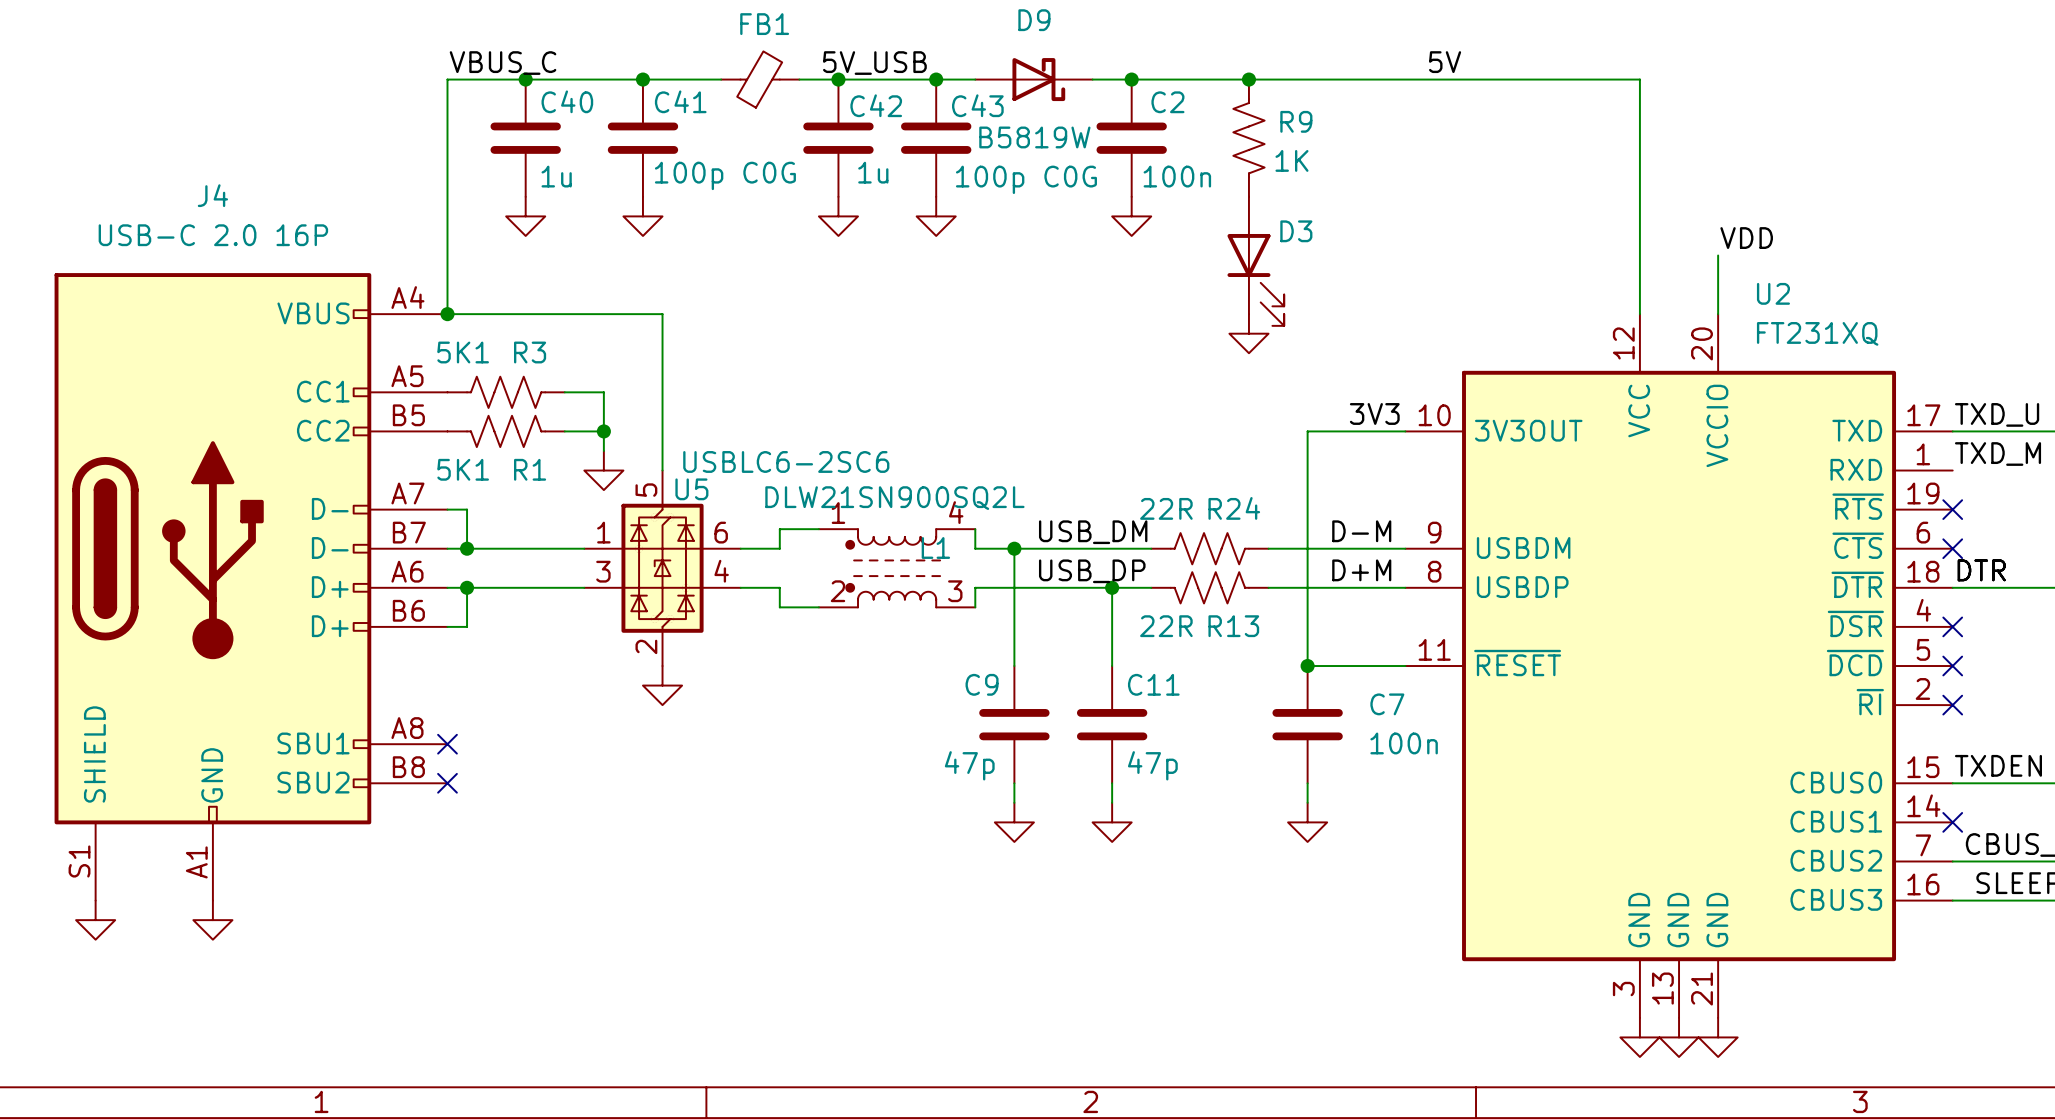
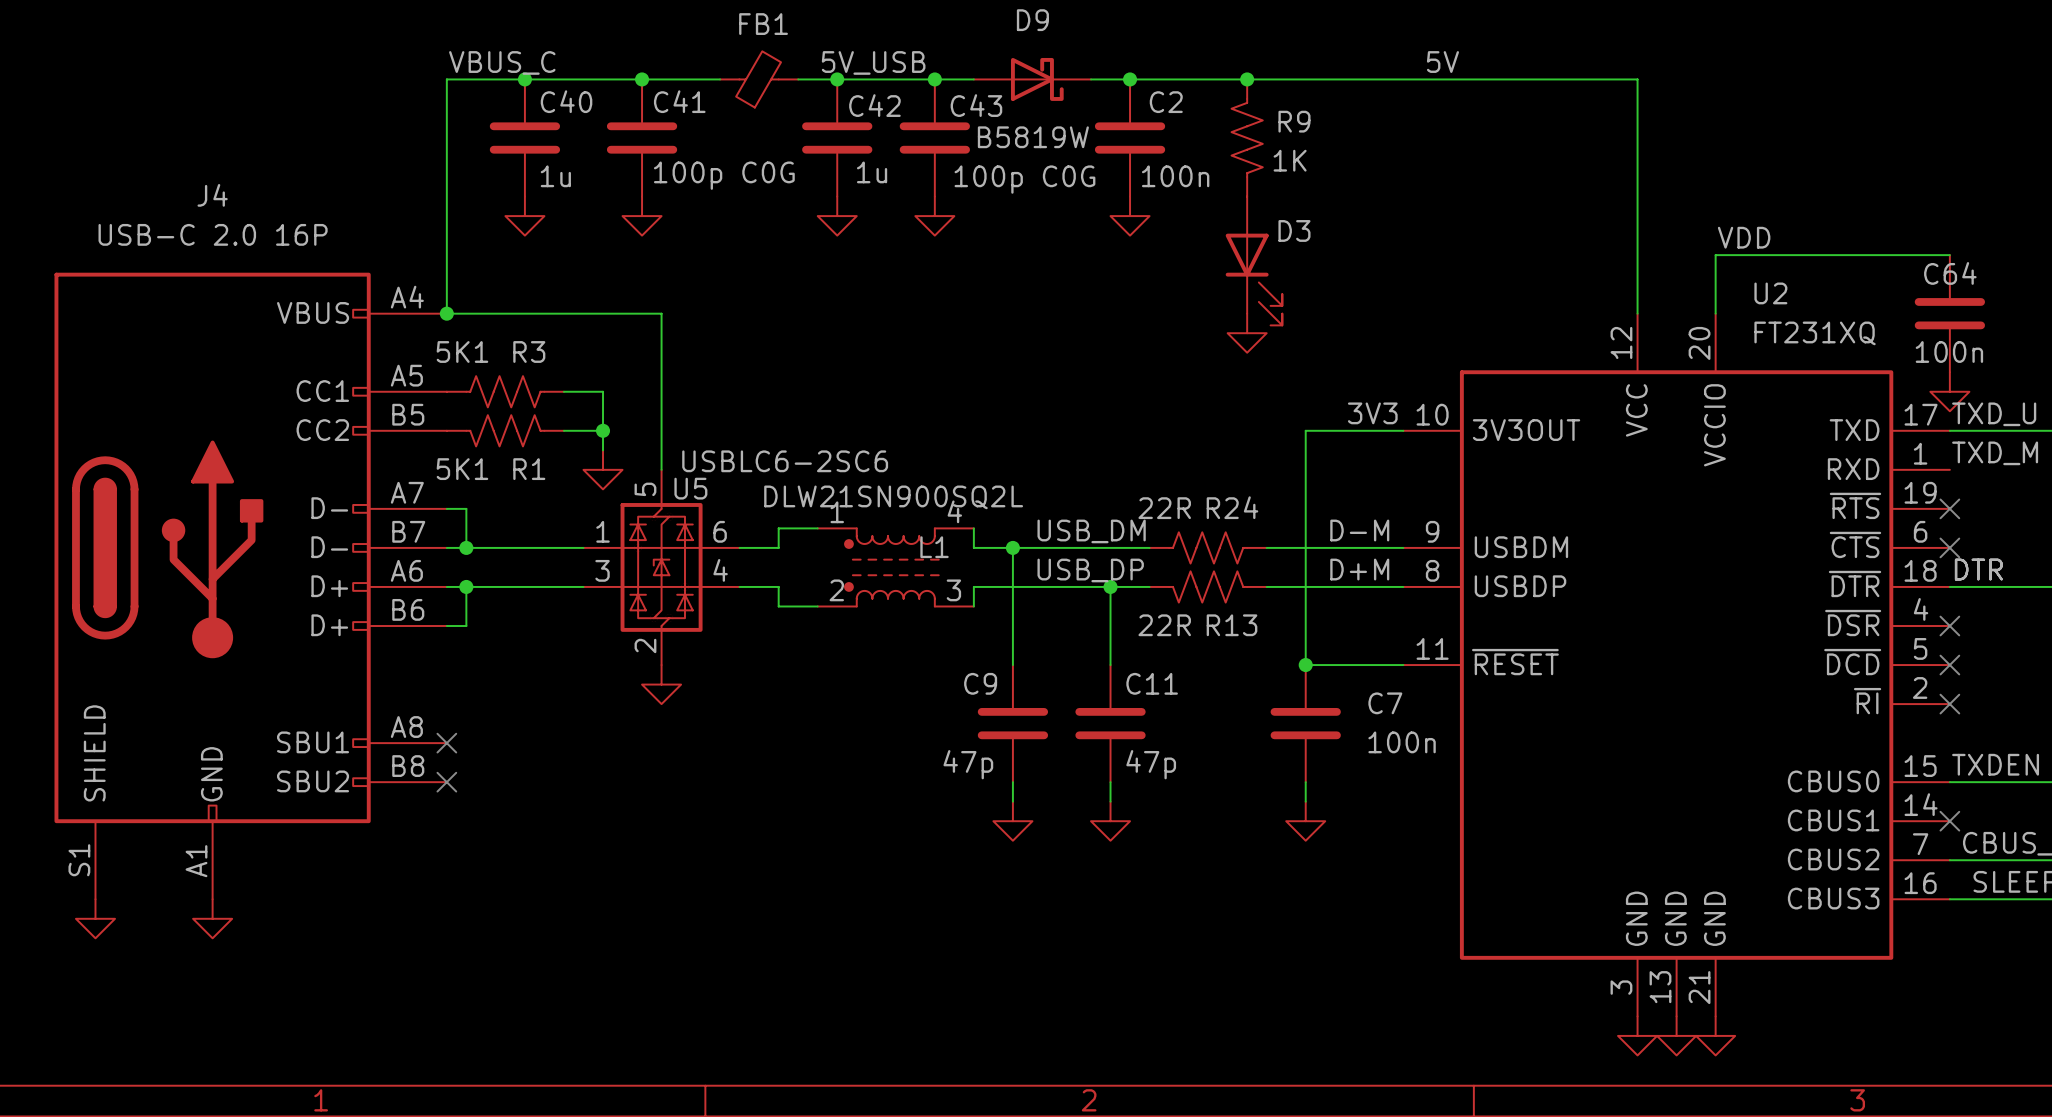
wire: none -> (1715, 255) (1949, 255)
C64: none -> 100n (1949, 313)
power symbol: none -> (1949, 391)

